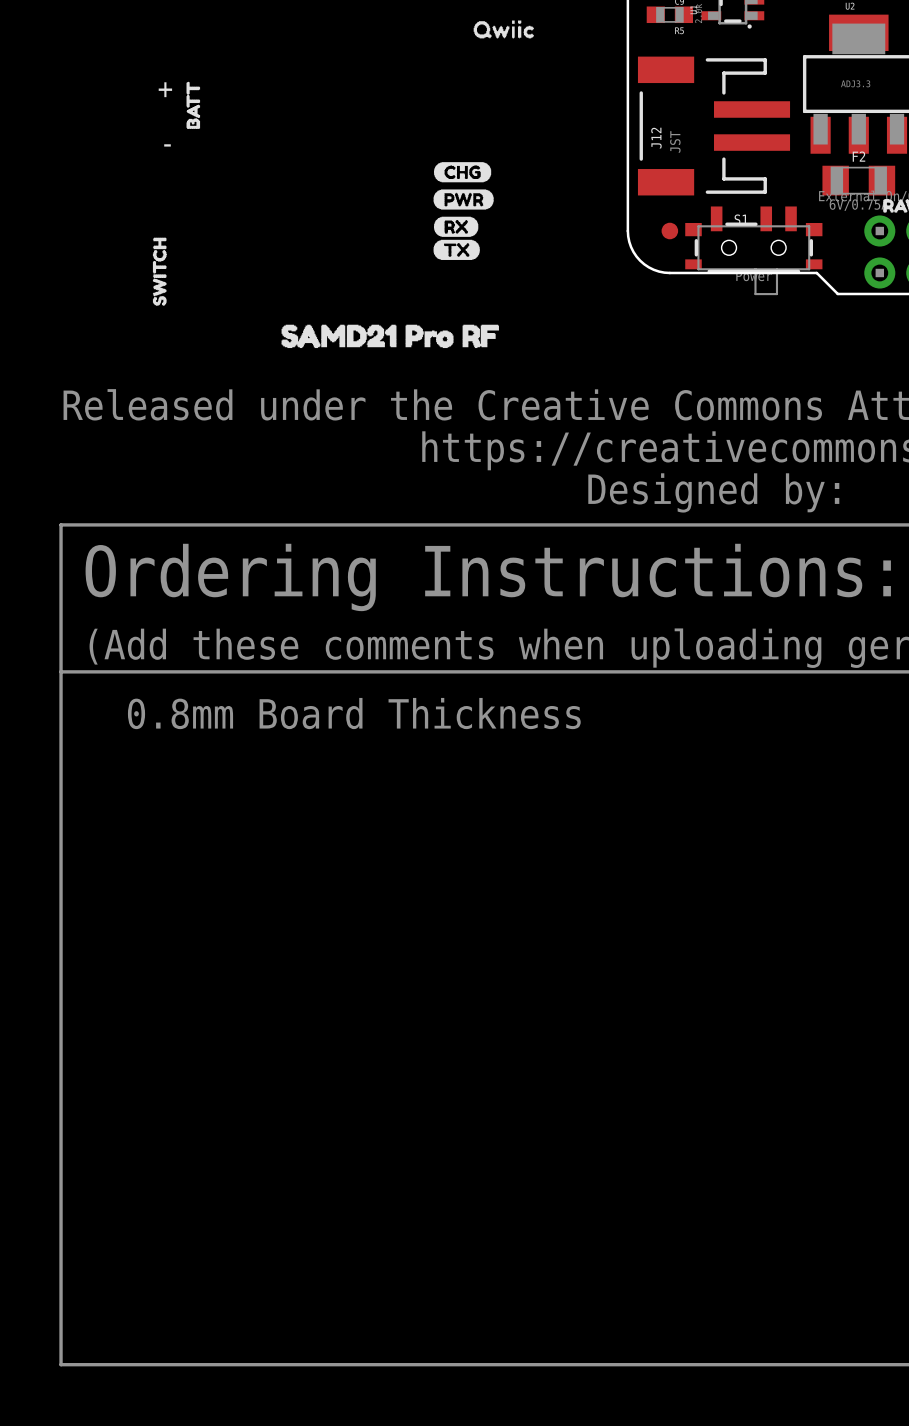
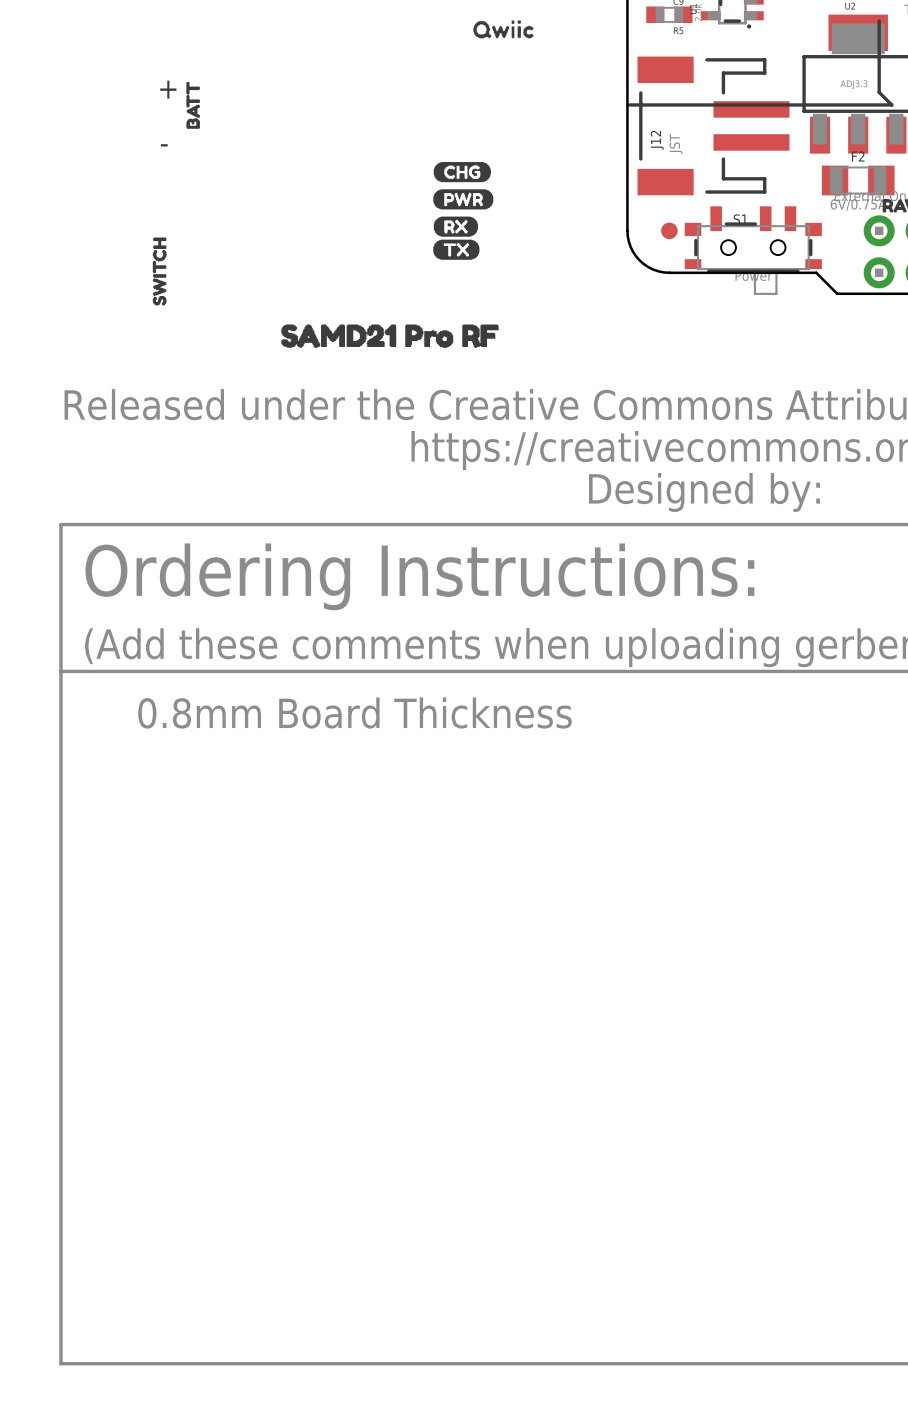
line: none -> (879, 21) (879, 92) (891, 104) (629, 104)

